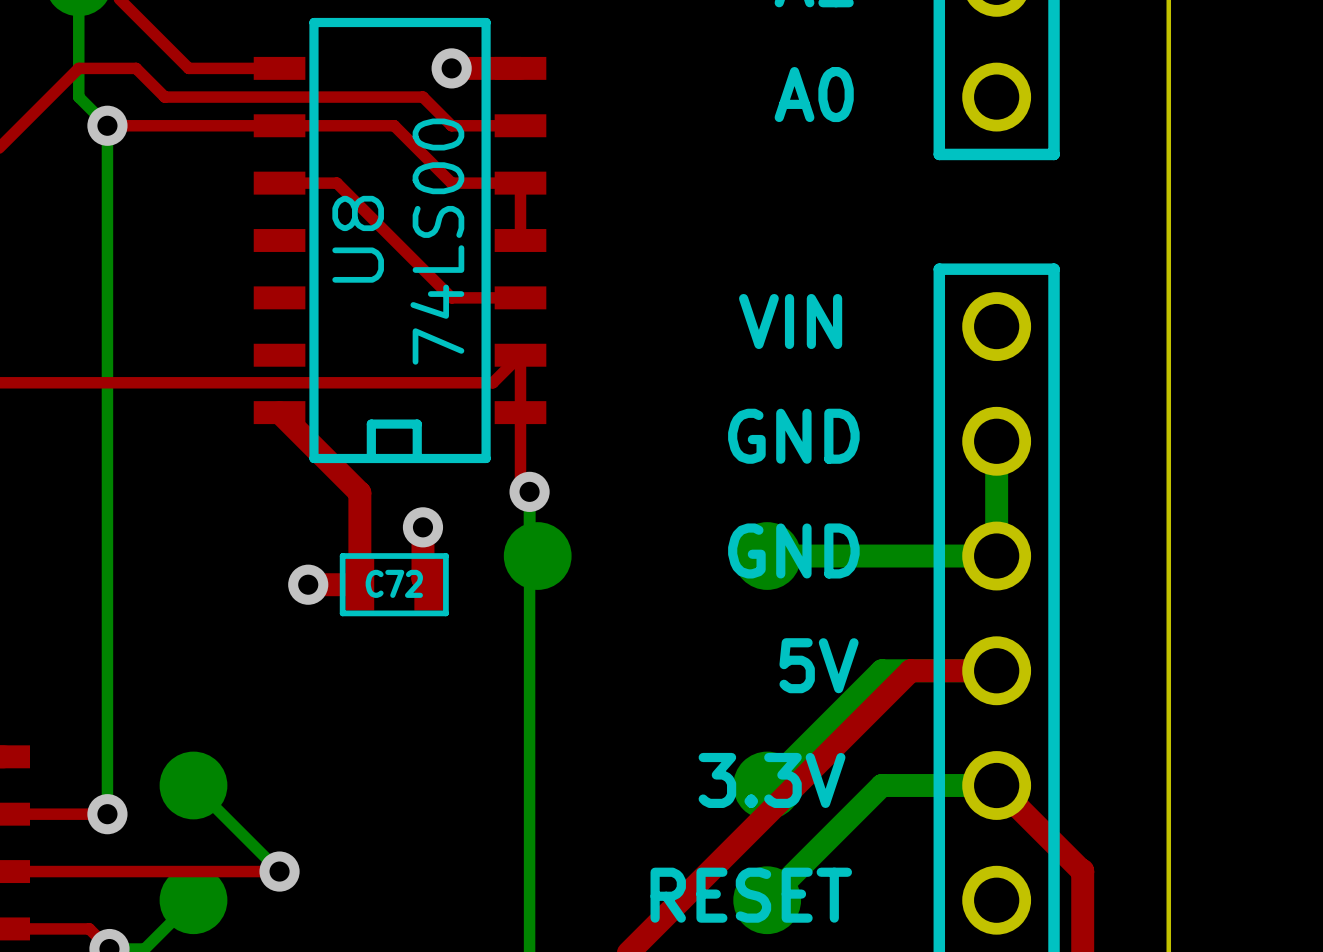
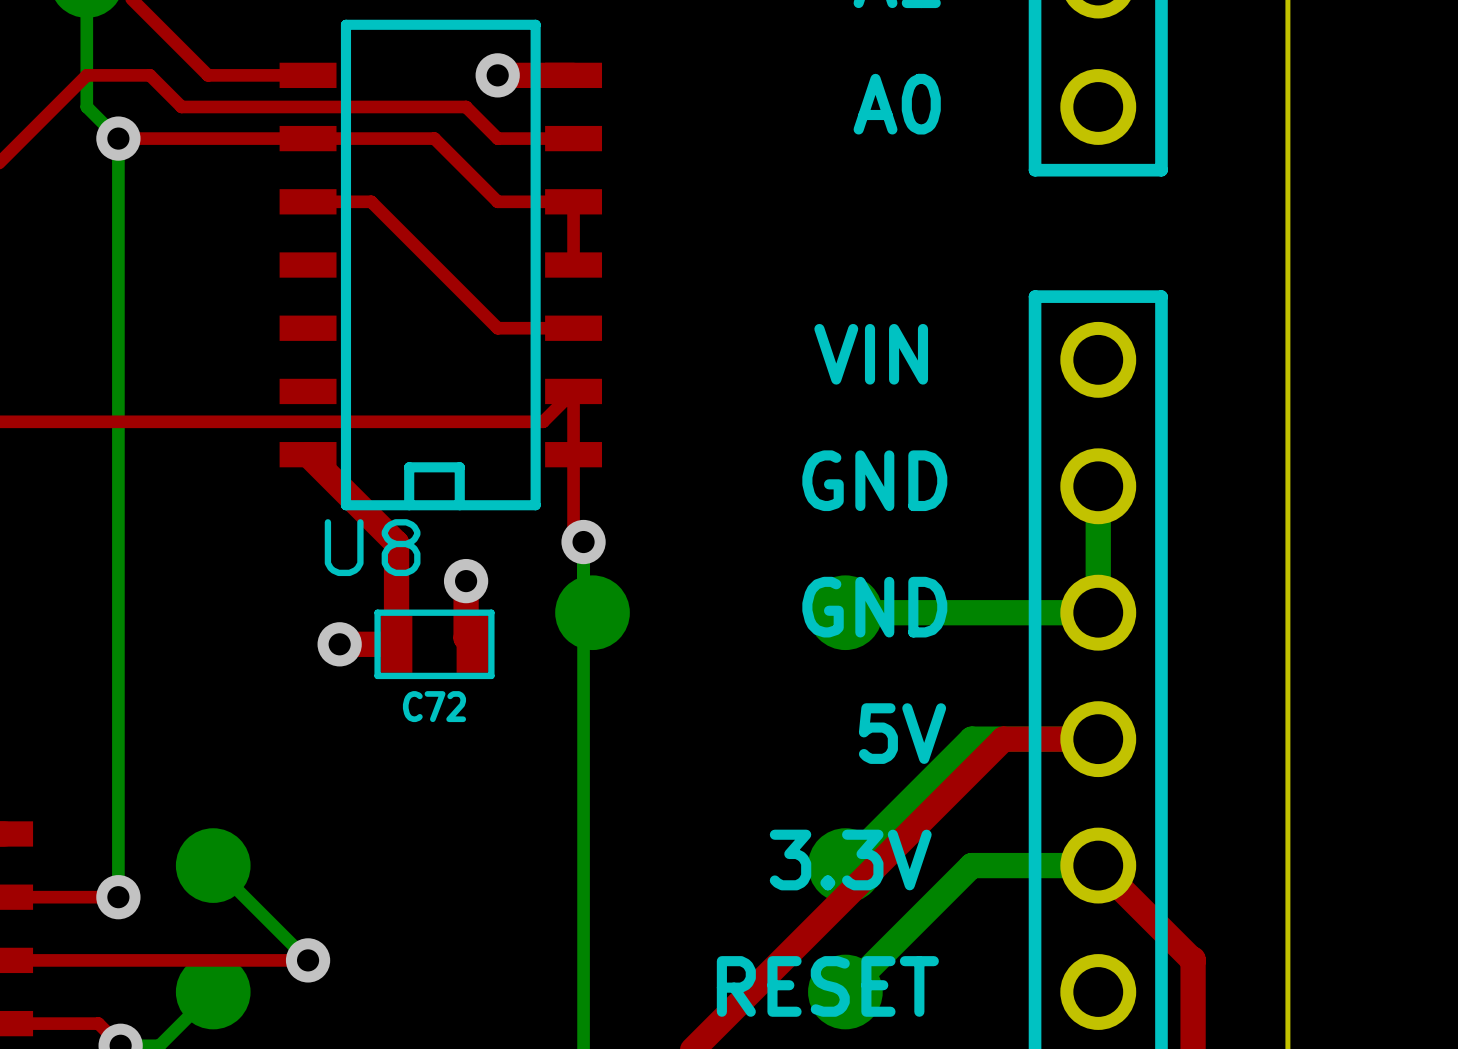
U8 name rotation: 0° (358, 239) -> 90° clockwise (372, 547)
U8 name position: U8 (358, 239) -> U8 (372, 547)
U8 value: 74LS00 (437, 241) -> none
C72 name position: C72 (394, 583) -> C72 (434, 706)

